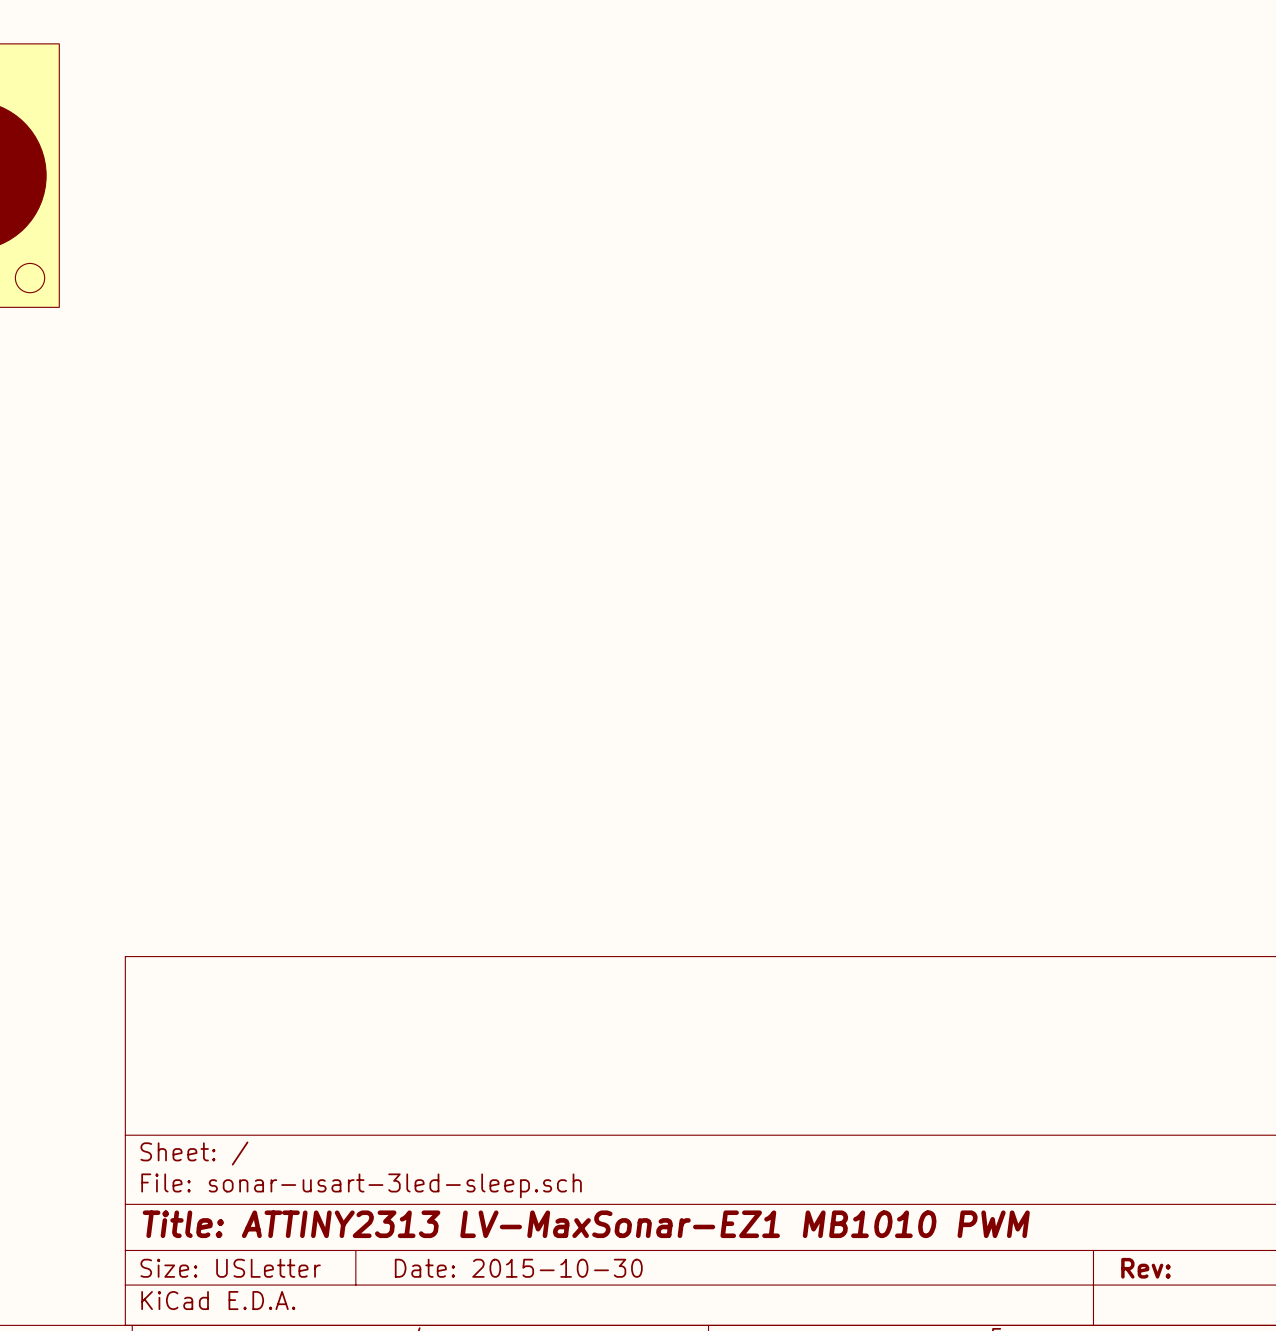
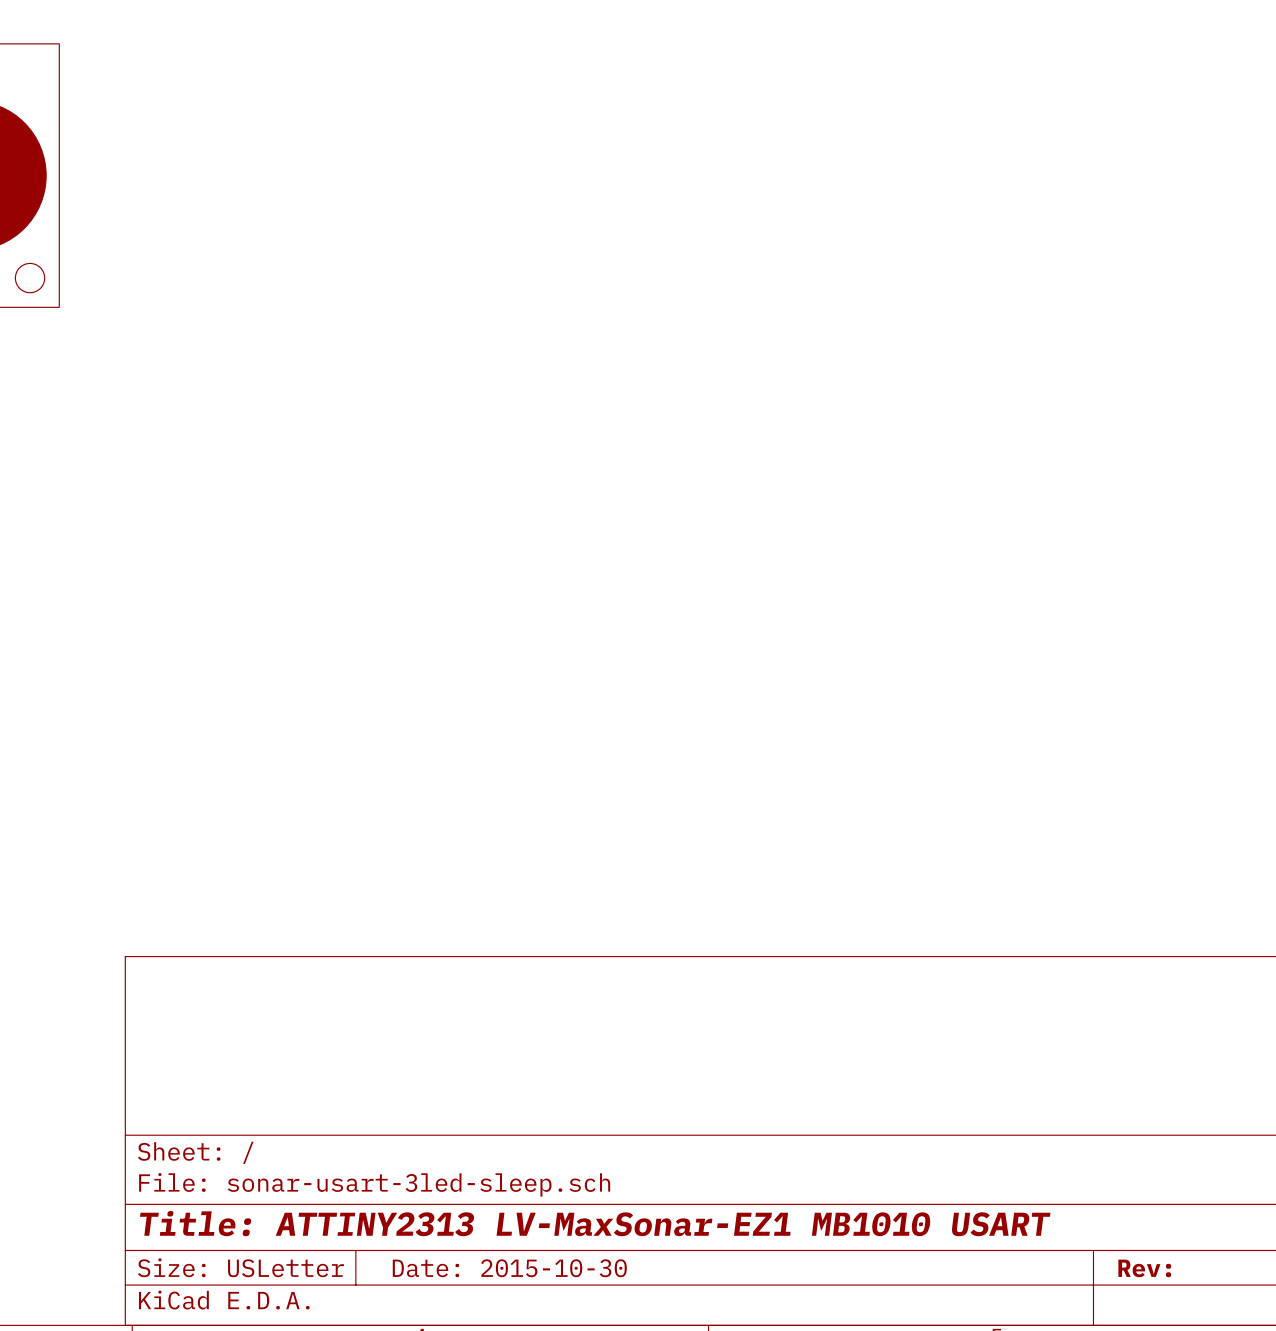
title block: Title: ATTINY2313 LV-MaxSonar-EZ1 MB1010 PWM (586, 1224) -> Title: ATTINY2313 LV-MaxSonar-EZ1 MB1010 USART (595, 1223)

